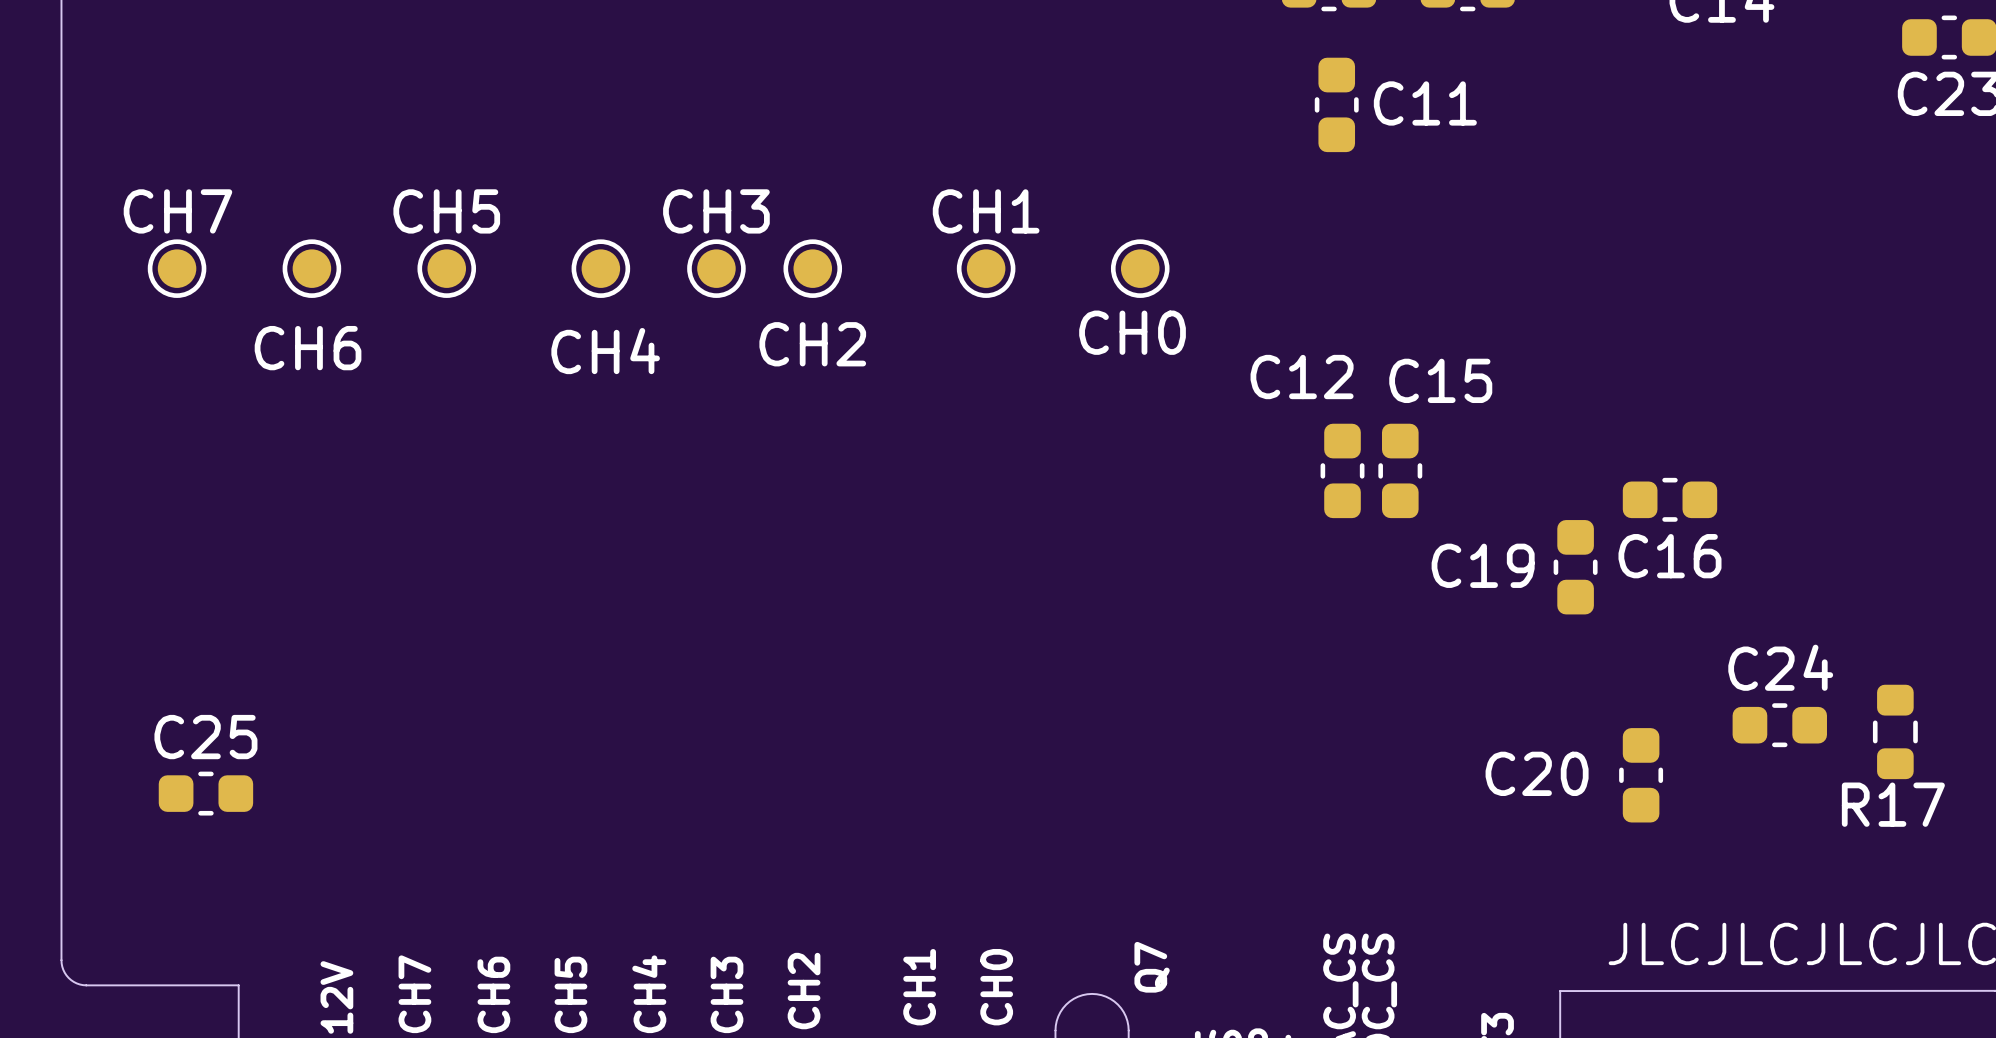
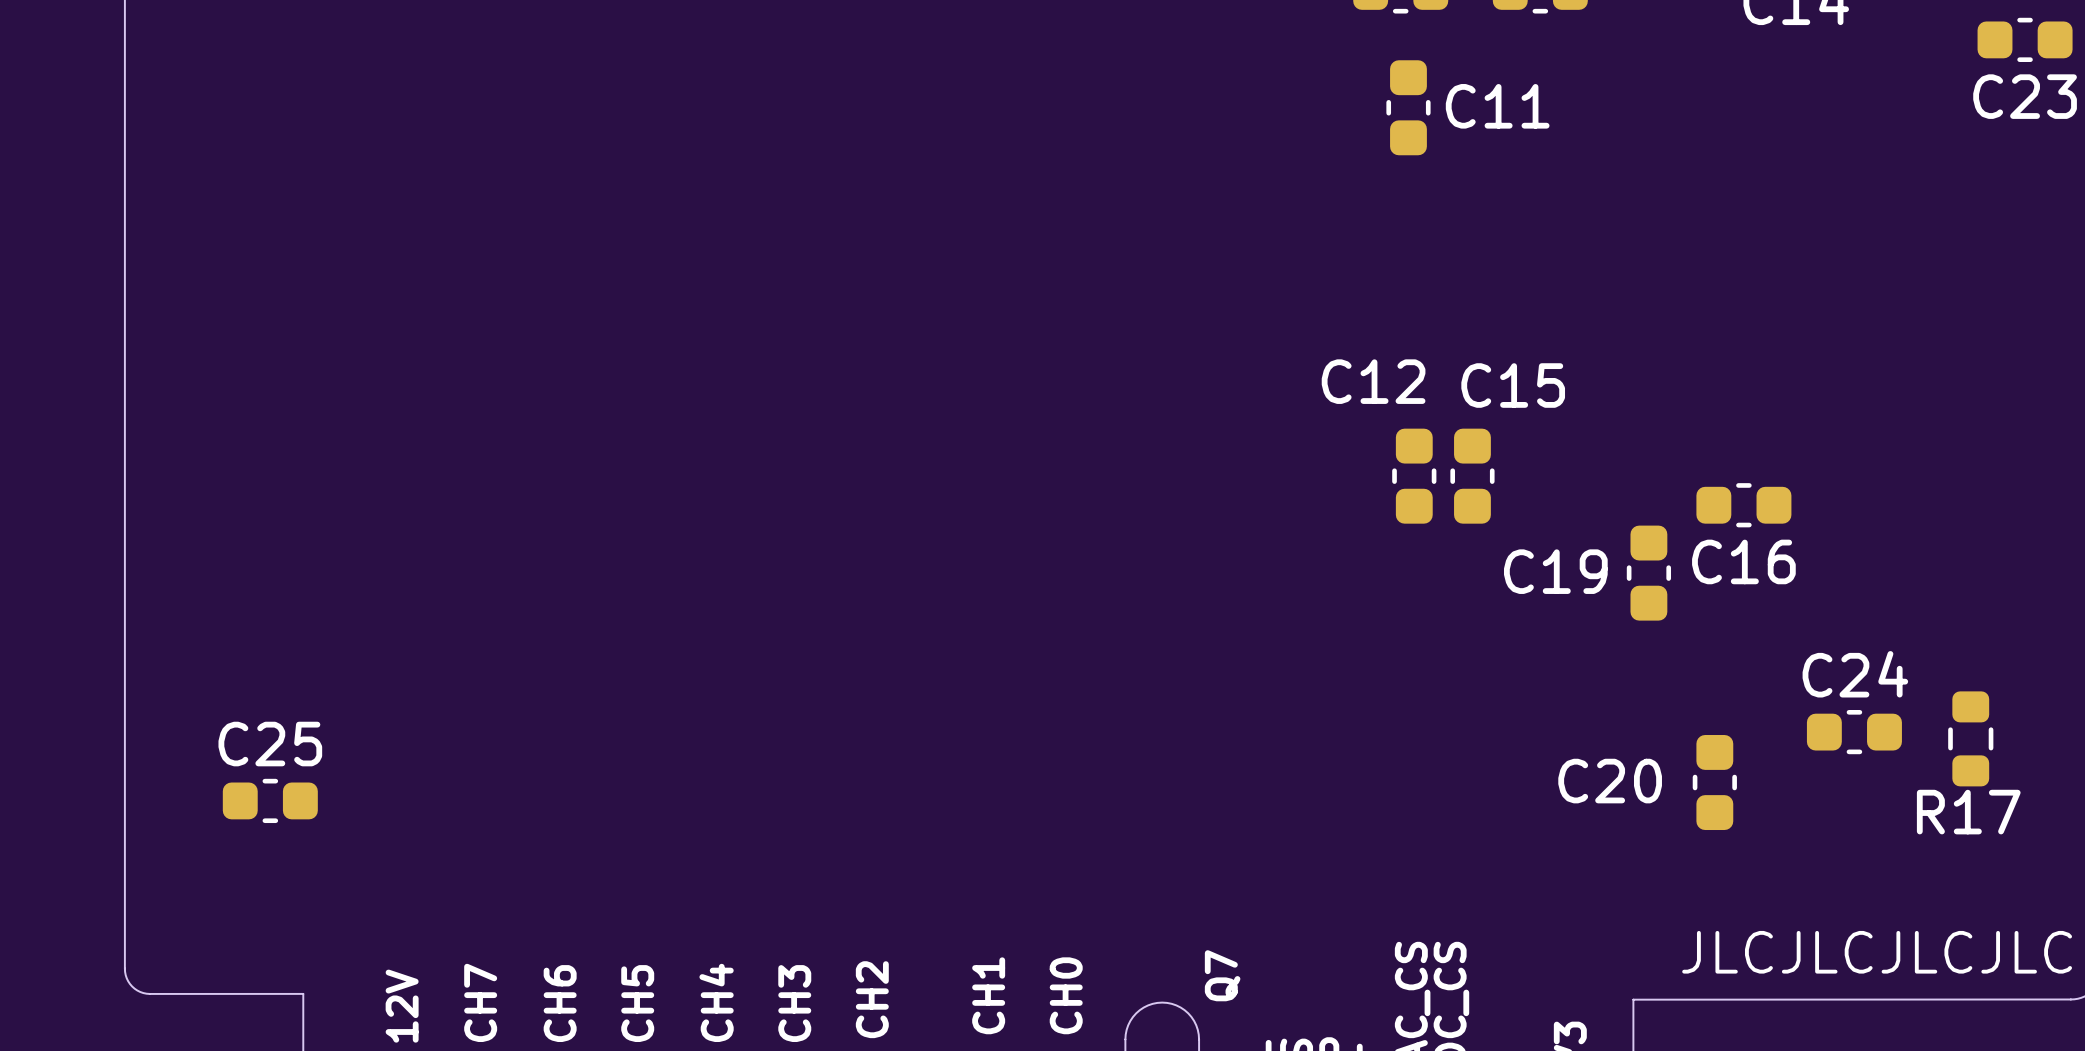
CH7: (177, 268) -> none
CH6: (311, 268) -> none
CH5: (446, 268) -> none
CH4: (600, 268) -> none
CH3: (716, 268) -> none
CH2: (812, 268) -> none
CH1: (986, 268) -> none
CH0: (1140, 268) -> none

